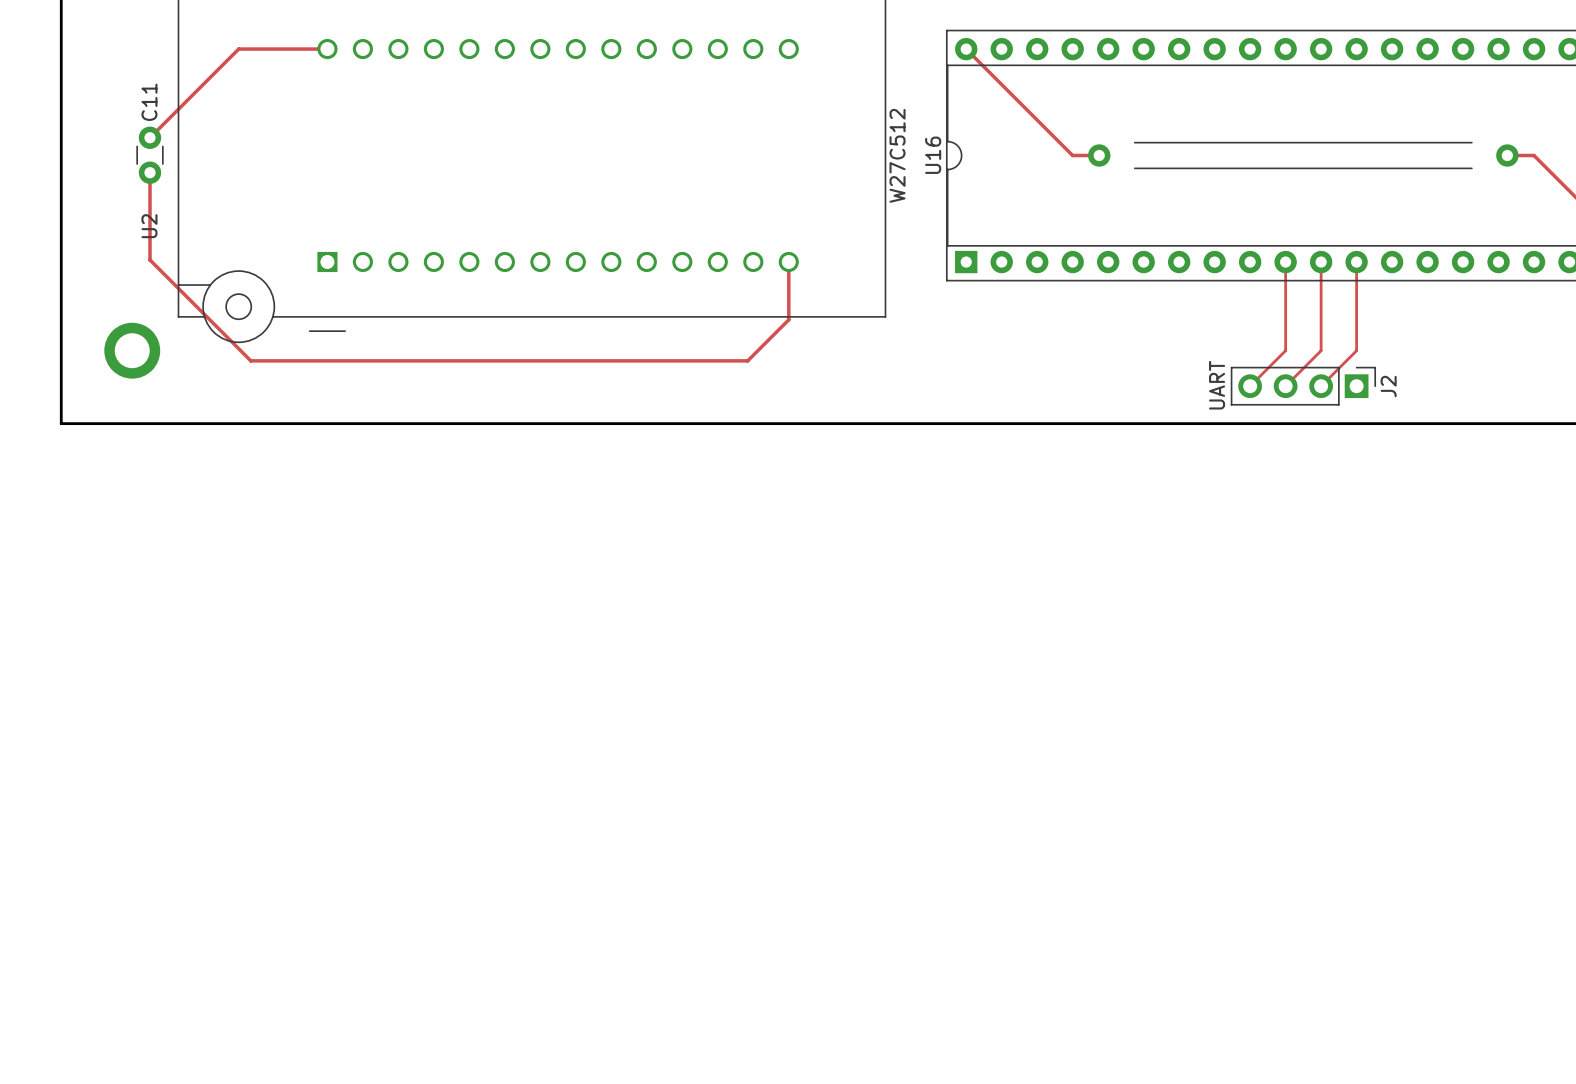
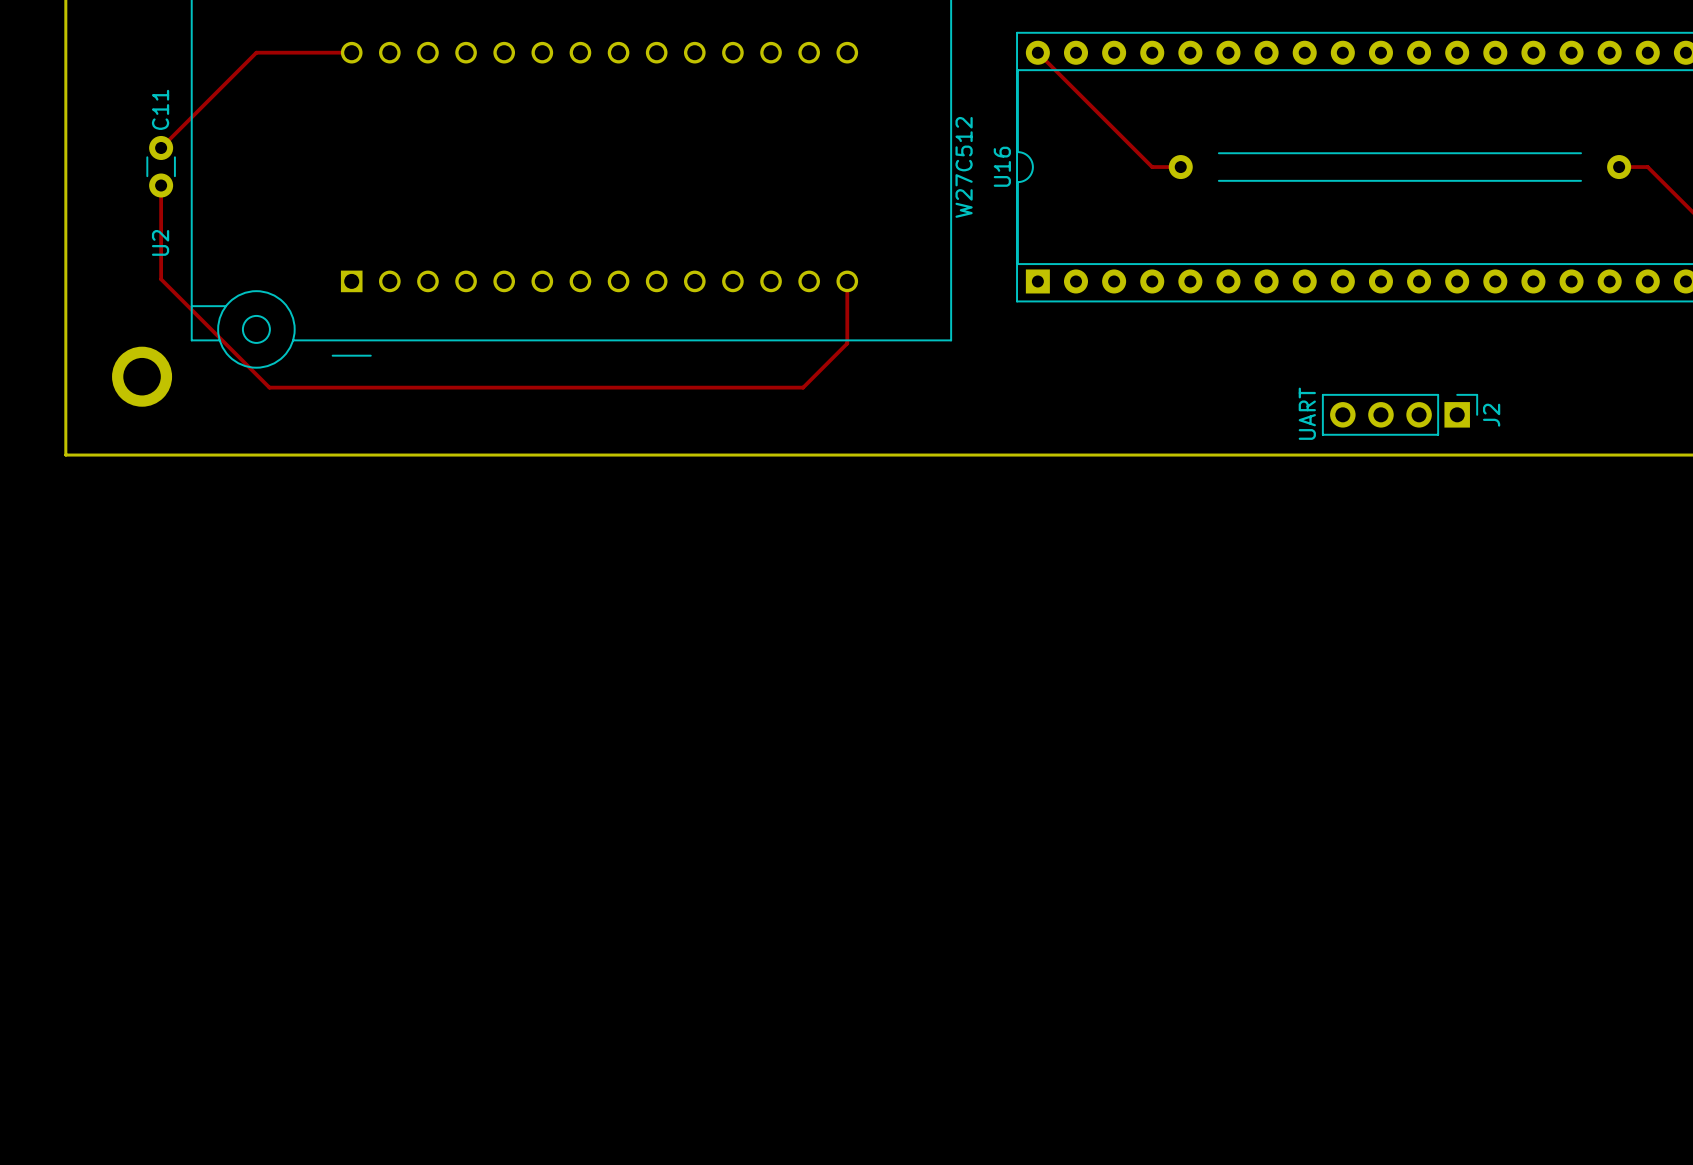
top track: (1285, 262) (1285, 350) (1250, 386) -> none
top track: (1321, 262) (1321, 350) (1285, 386) -> none
top track: (1356, 262) (1356, 350) (1321, 386) -> none

